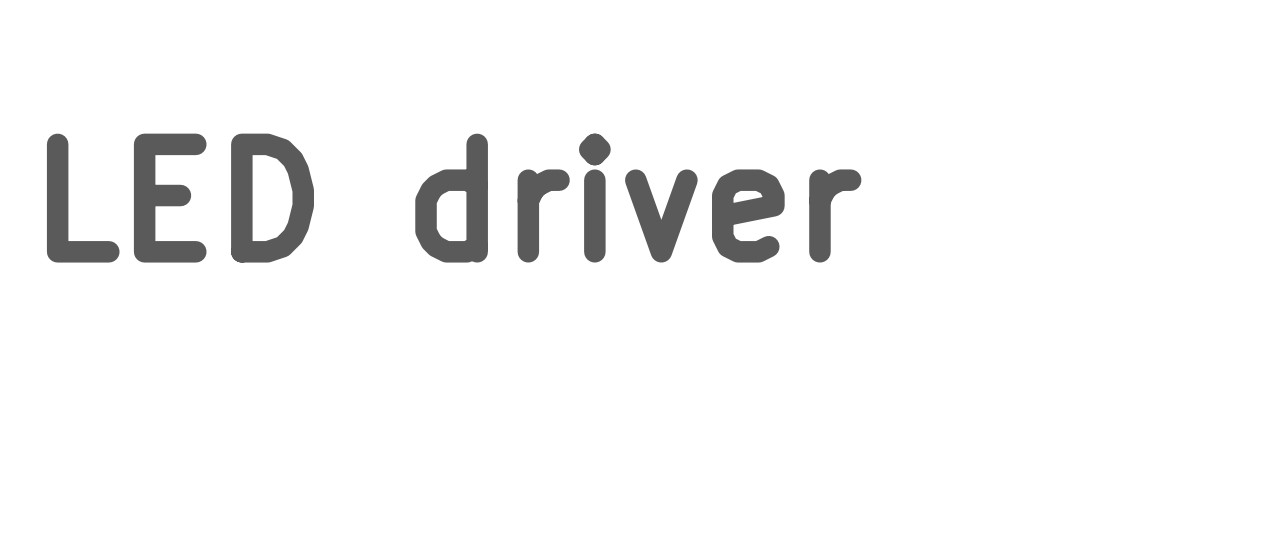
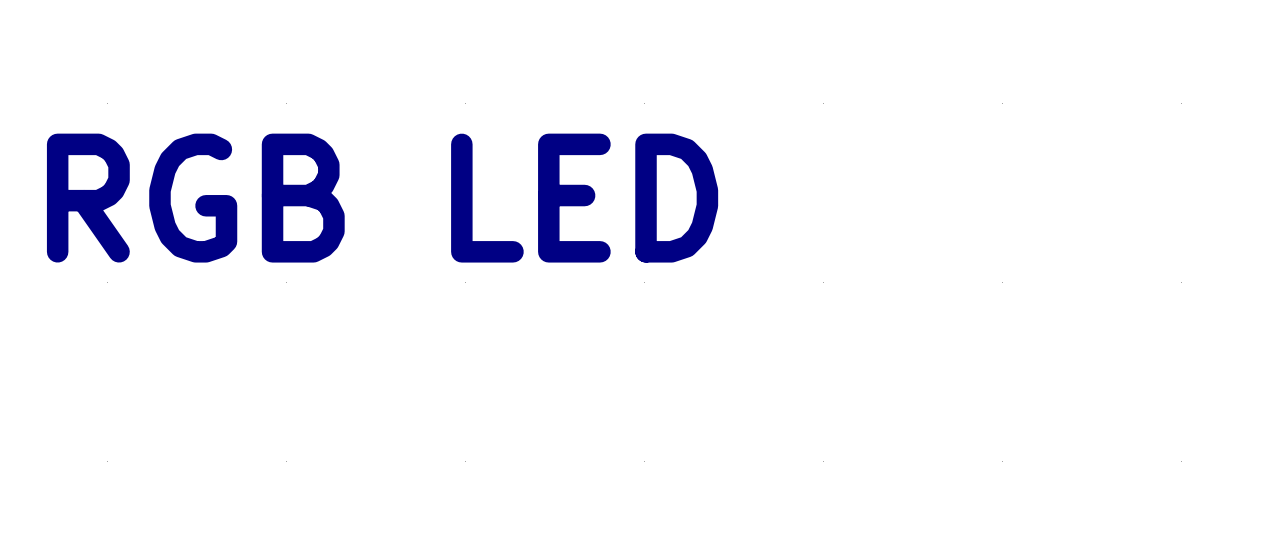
text: LED driver (454, 198) -> RGB LED (382, 198)

